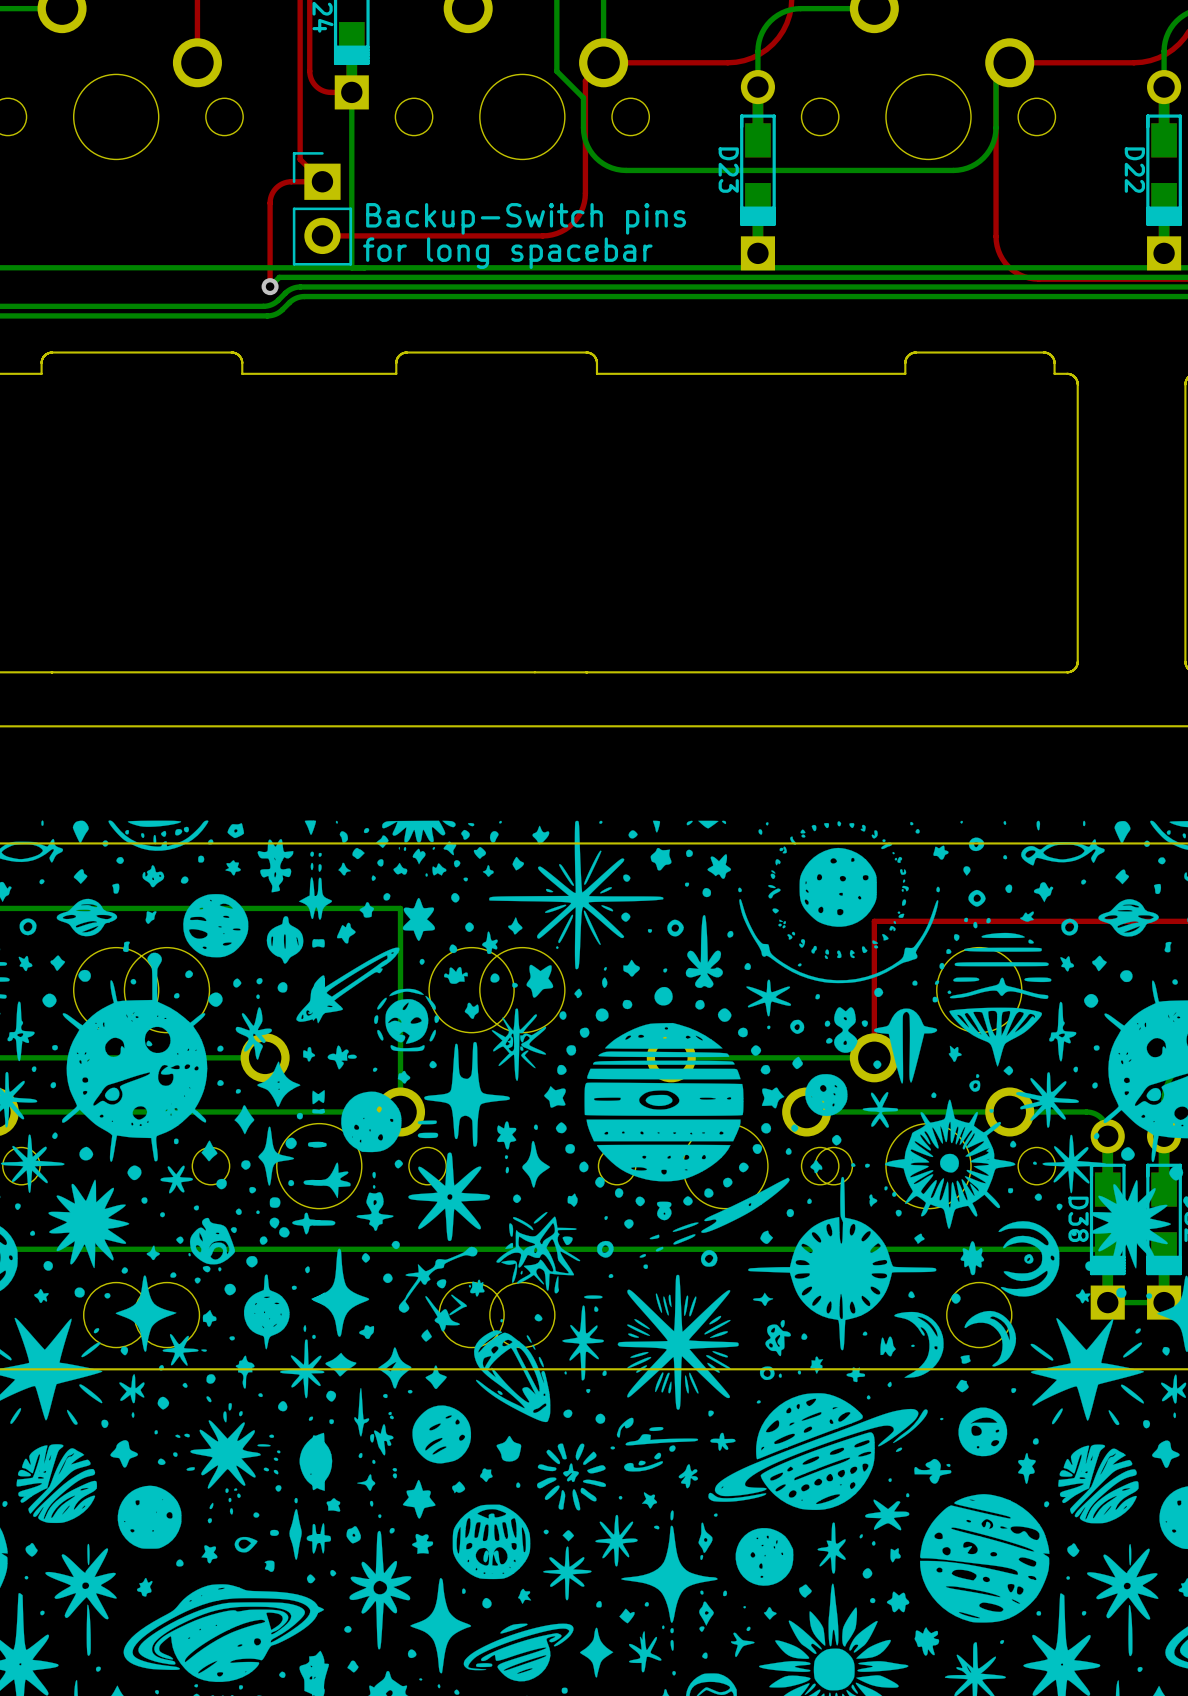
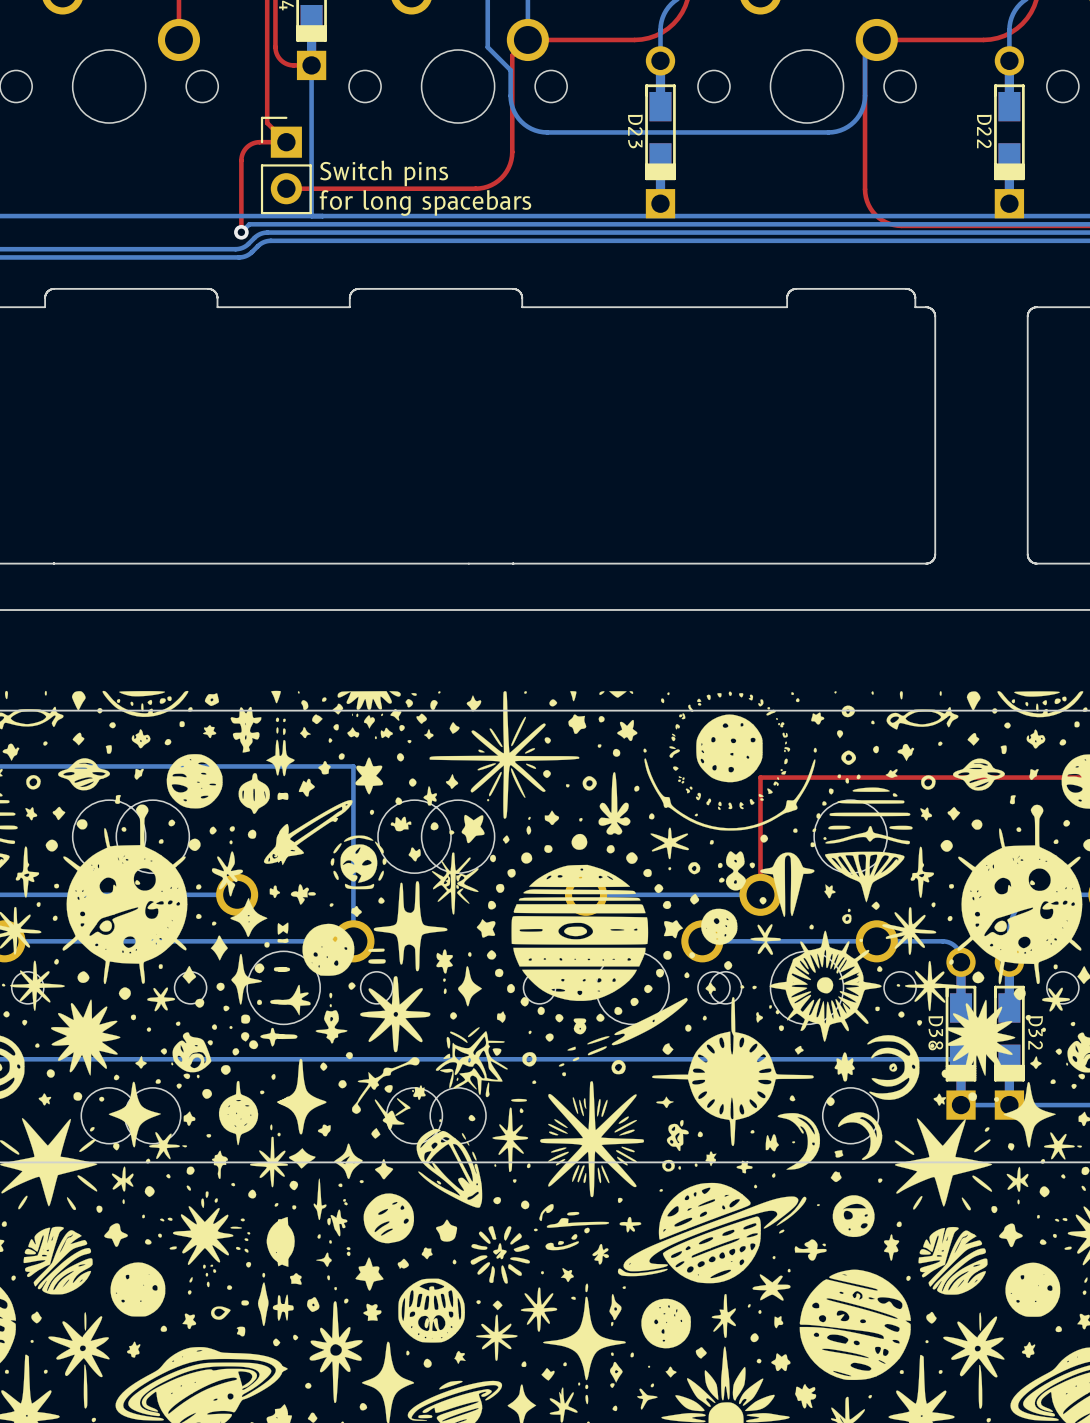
text: Backup-Switch pins (526, 218) -> Switch pins (384, 173)
text: for long spacebar (507, 253) -> for long spacebars (425, 202)

